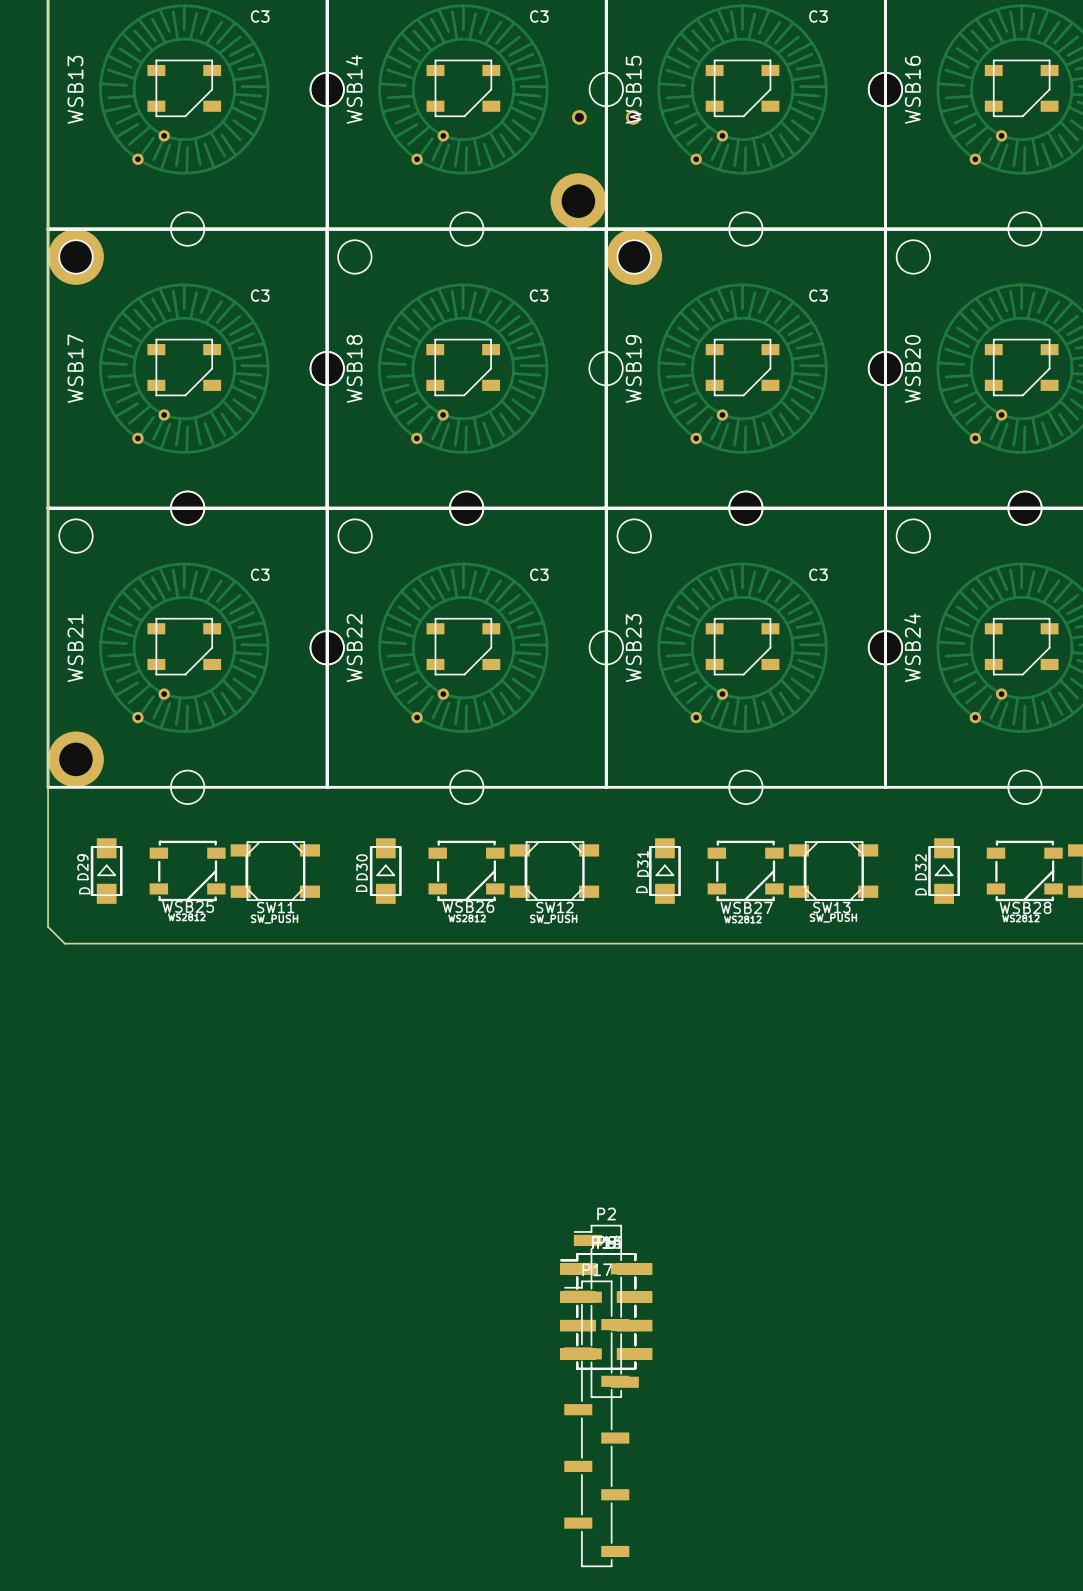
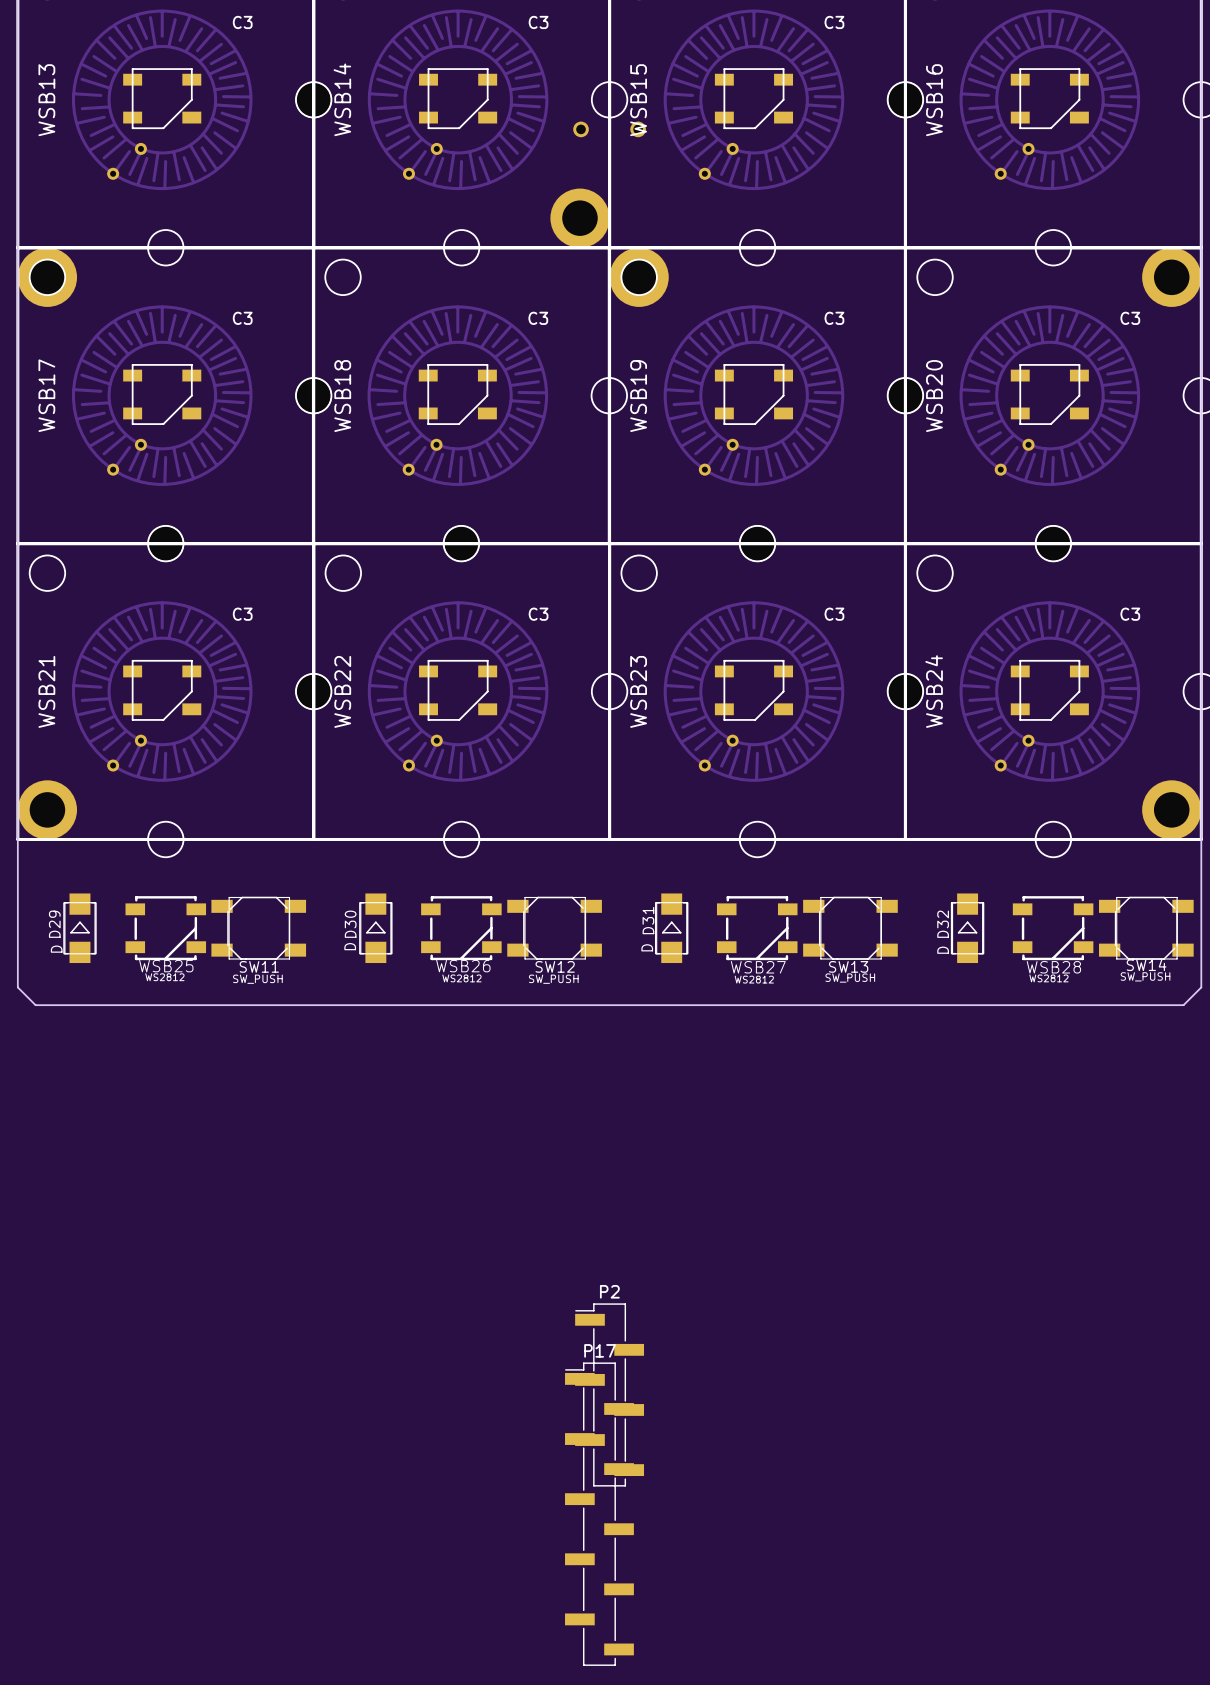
part: (606, 1311) -> none
part: (606, 1311) -> none
part: (606, 1311) -> none
part: (606, 1311) -> none

